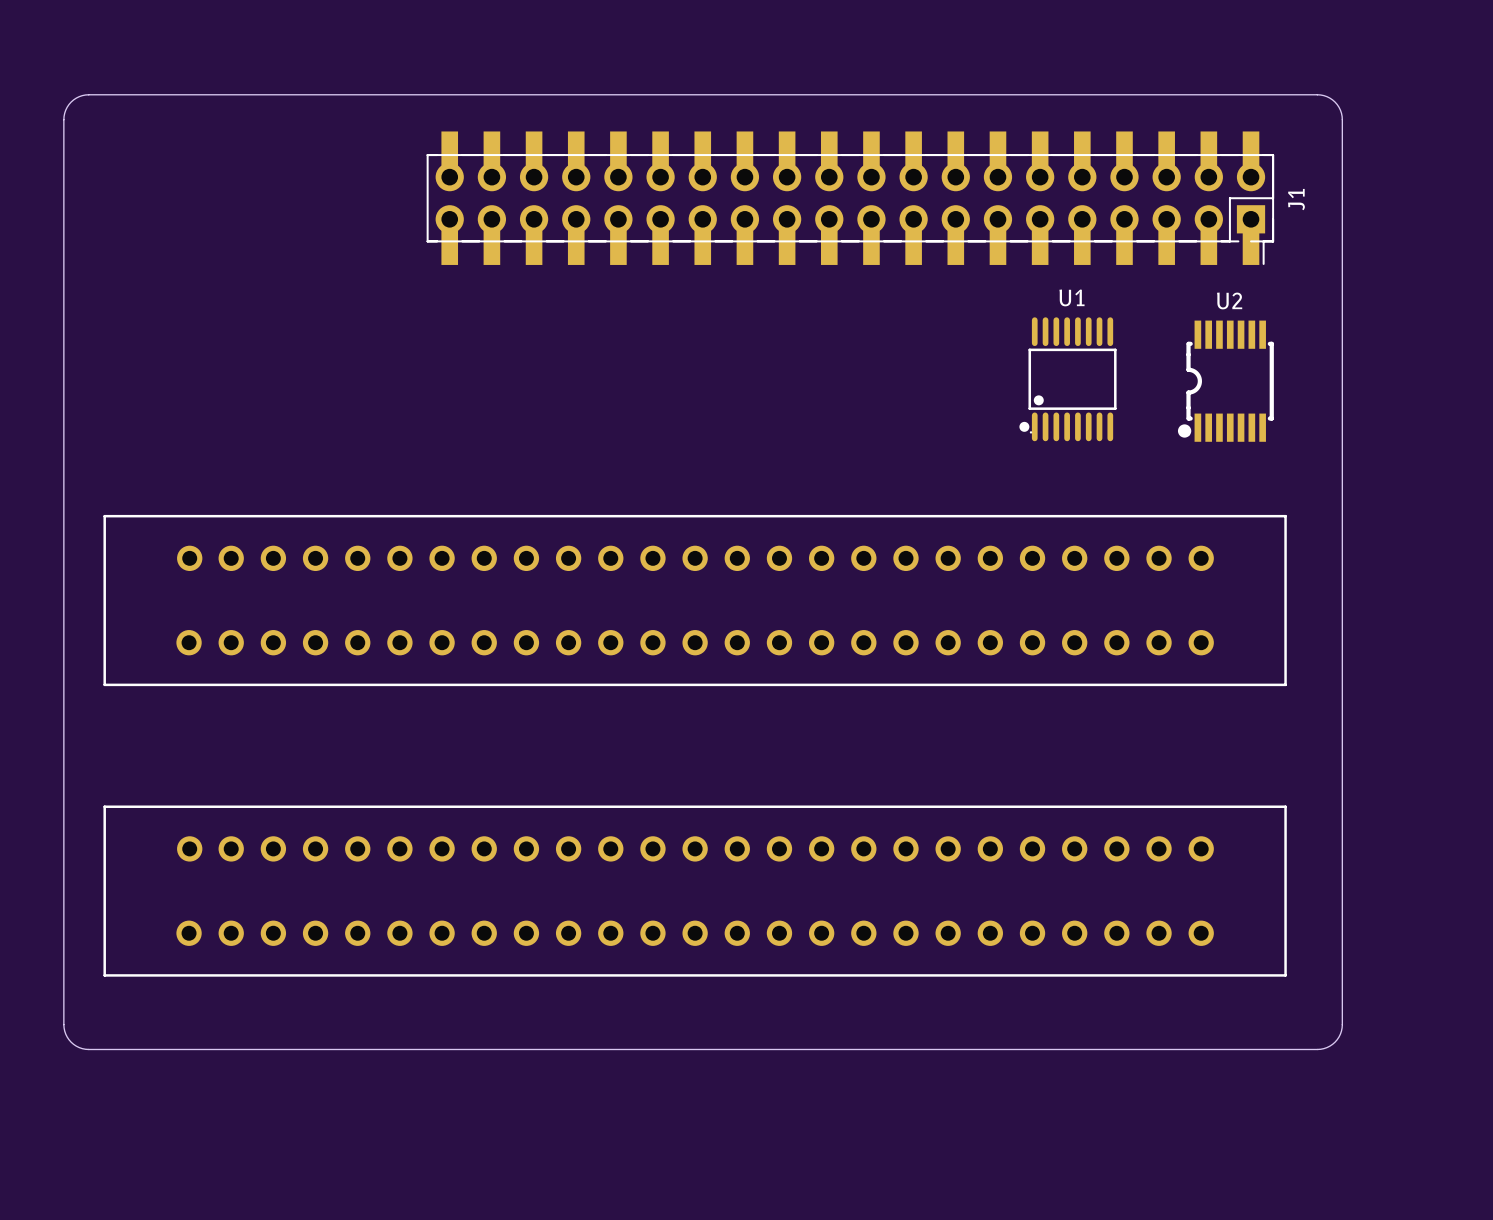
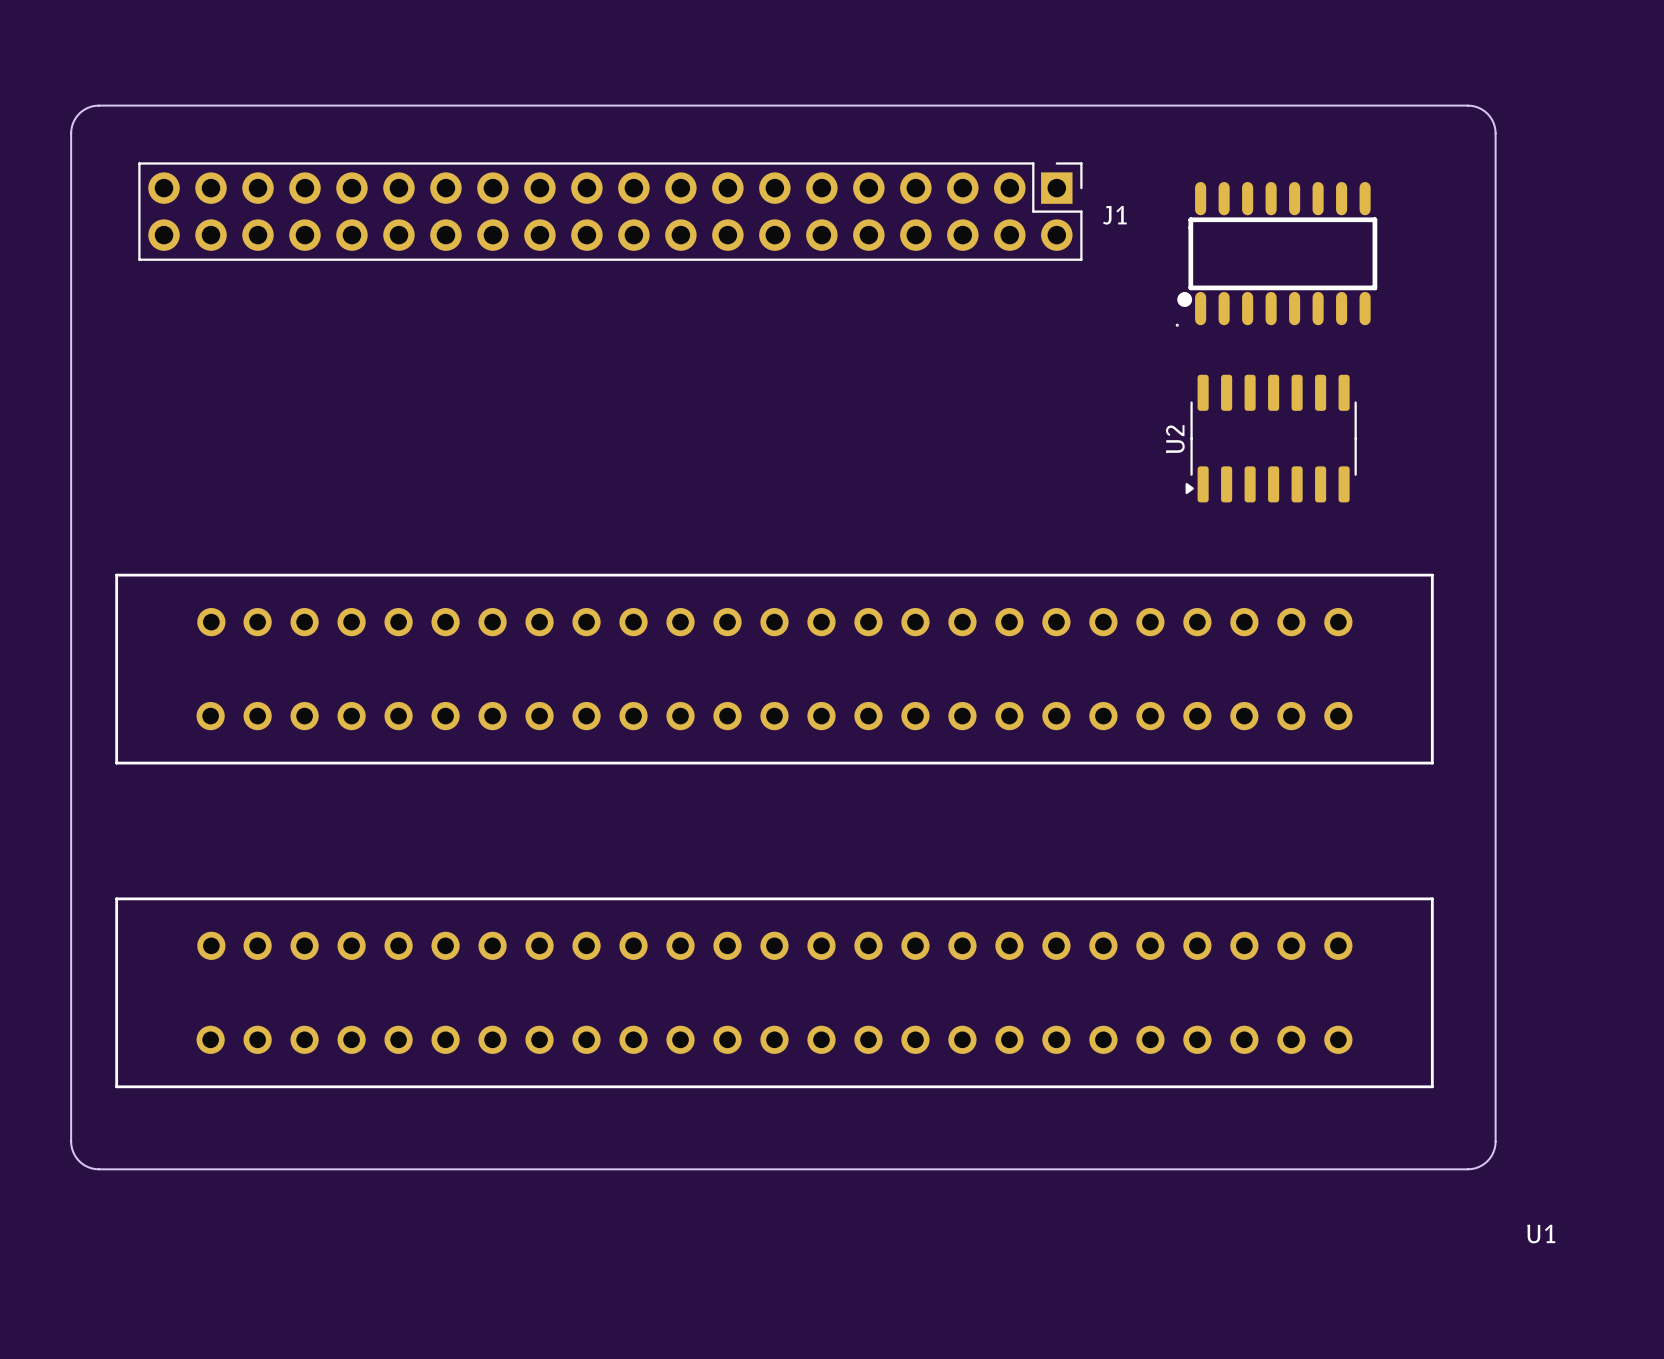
J1 footprint: [426, 131, 1275, 265] -> [138, 162, 1083, 261]
U1 name position: U1 (1071, 297) -> U1 (1541, 1234)
U2 name position: U2 (1229, 300) -> U2 (1175, 439)
U1 footprint: [1019, 317, 1117, 442] -> [1176, 181, 1378, 327]
U2 footprint: [1177, 320, 1274, 442] -> [1185, 374, 1357, 503]

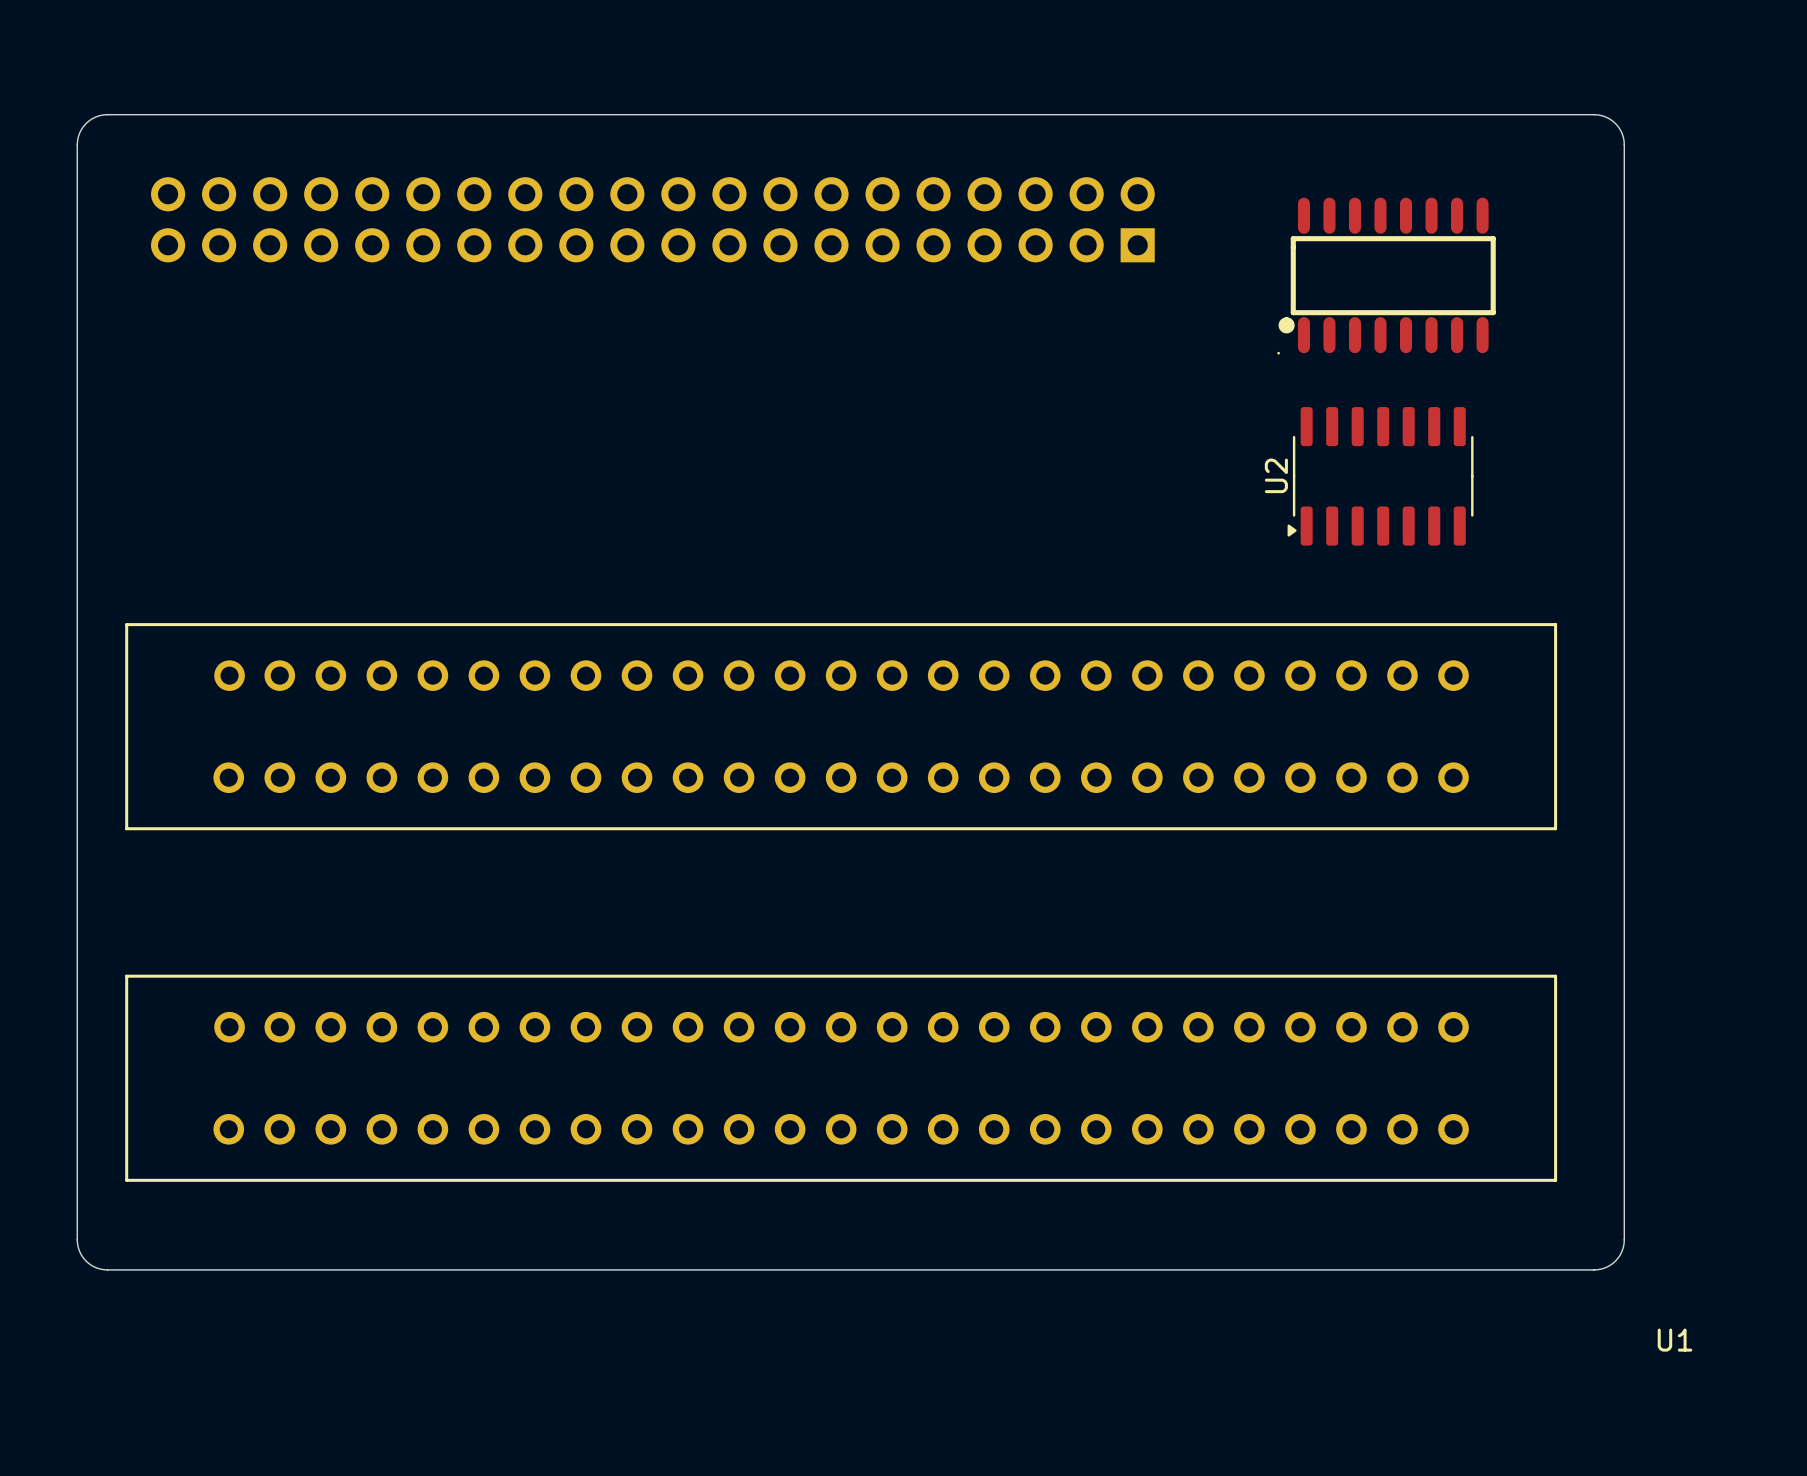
J1 side: top (610, 211) -> bottom (652, 219)

